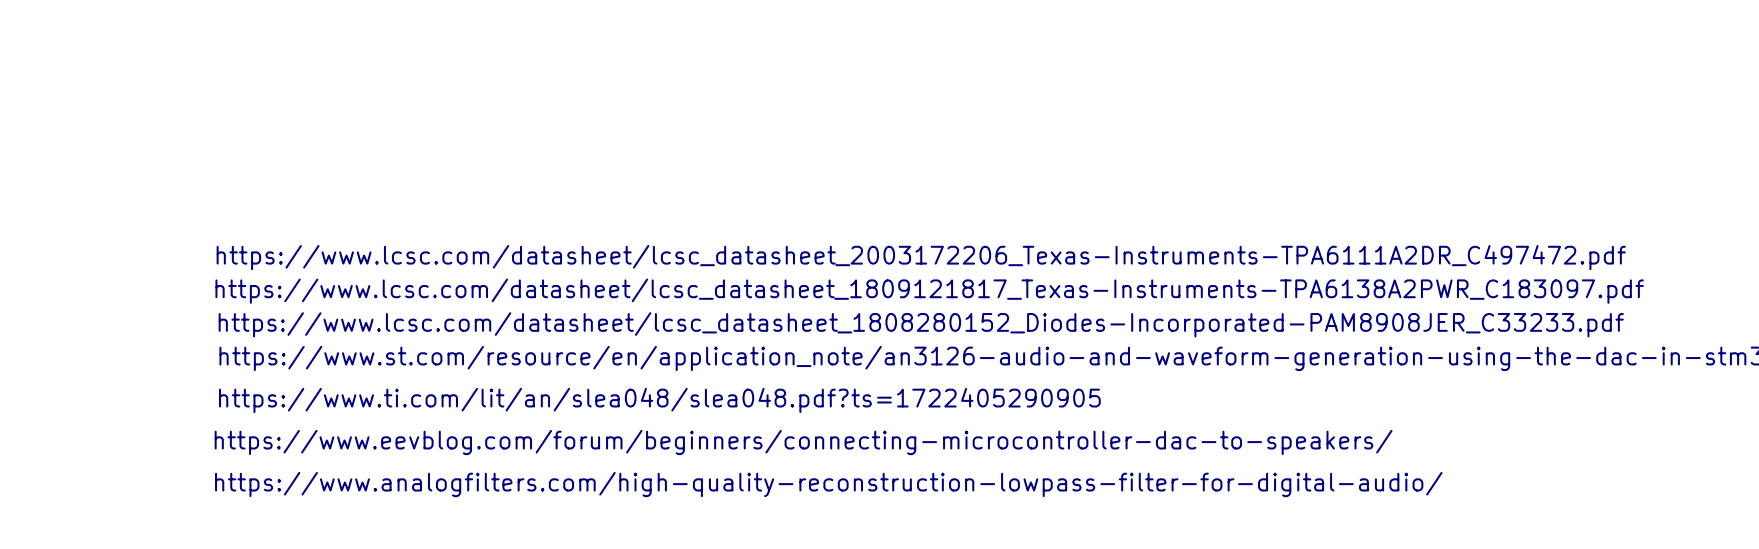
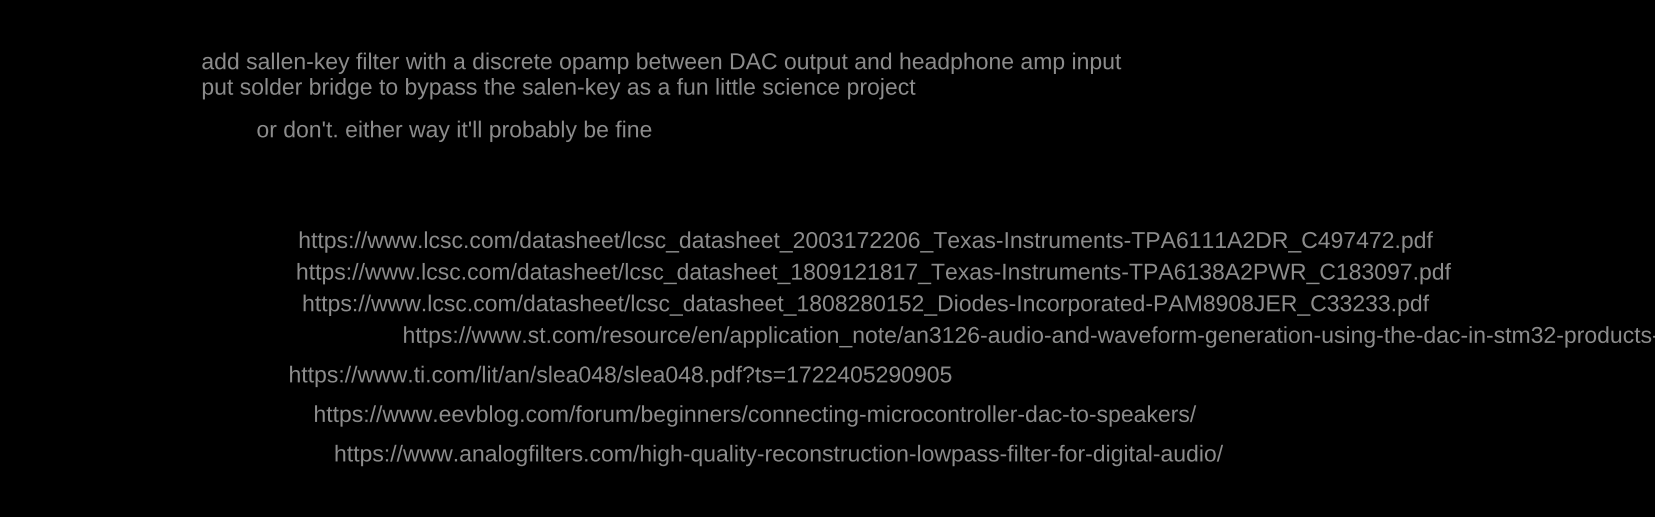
text: none -> add sallen-key filter with a discrete opamp between DAC output and headphone amp input (661, 63)
text: none -> put solder bridge to bypass the salen-key as a fun little science project (559, 88)
text: none -> or don't. either way it'll probably be fine (454, 131)

